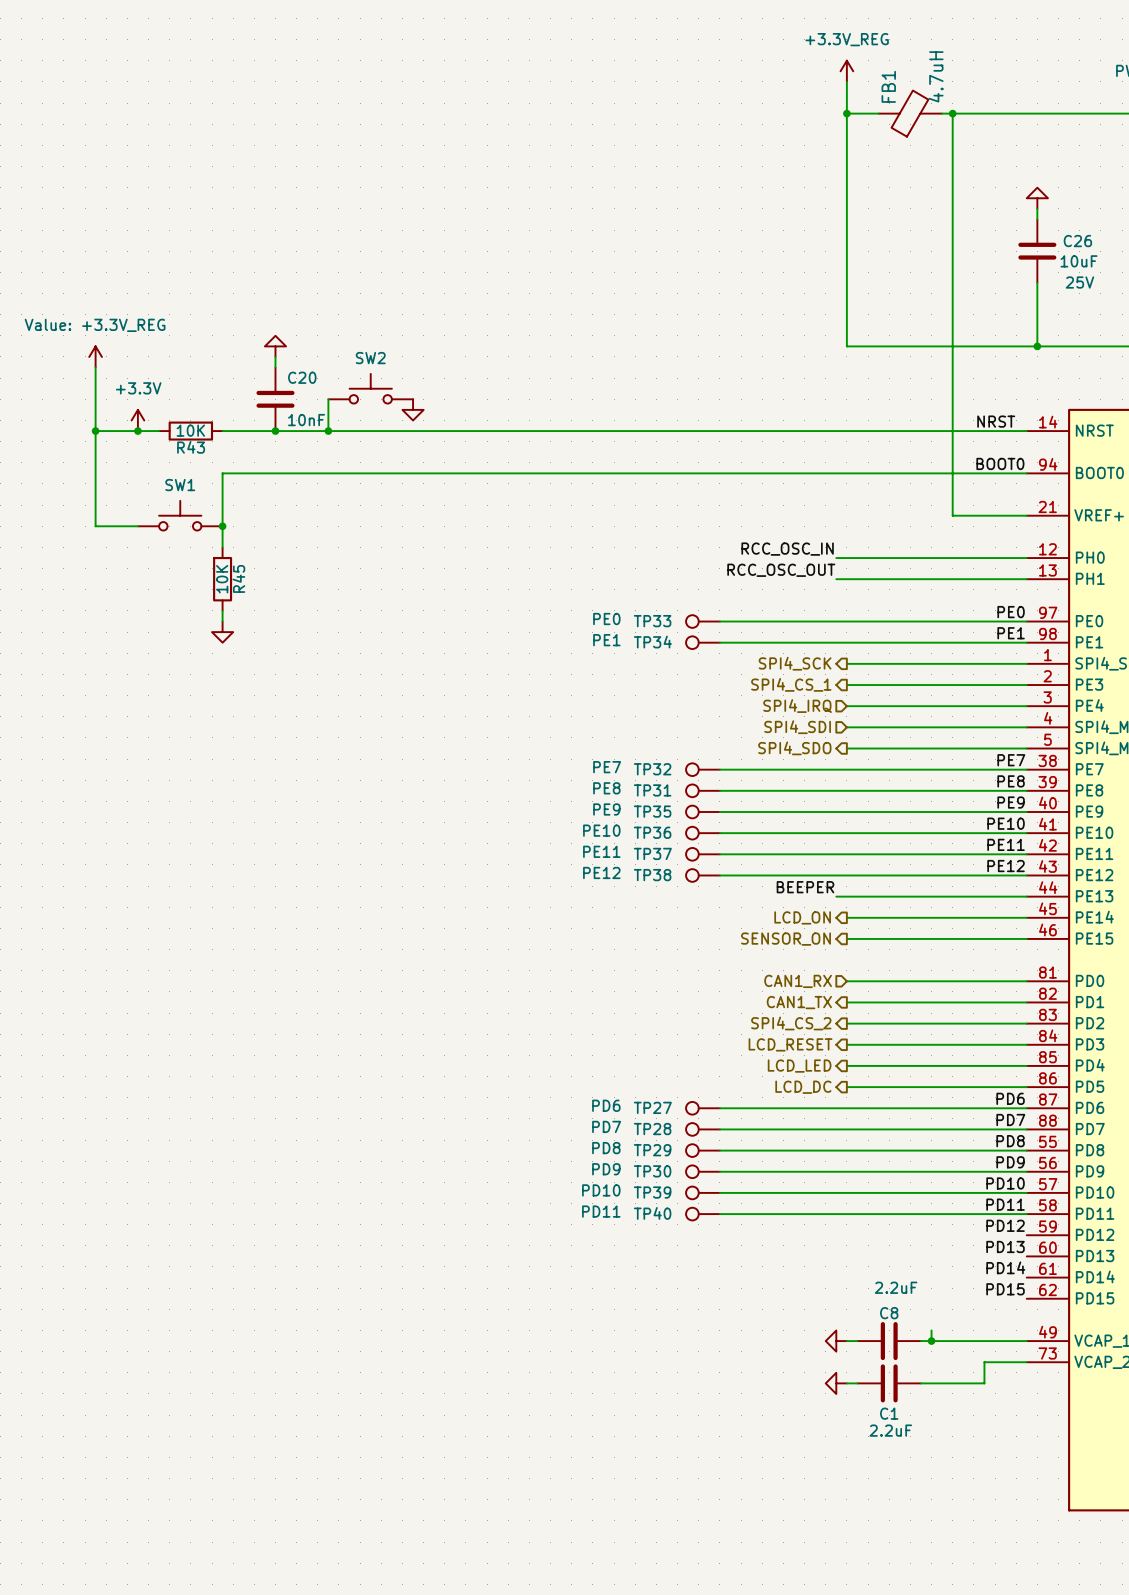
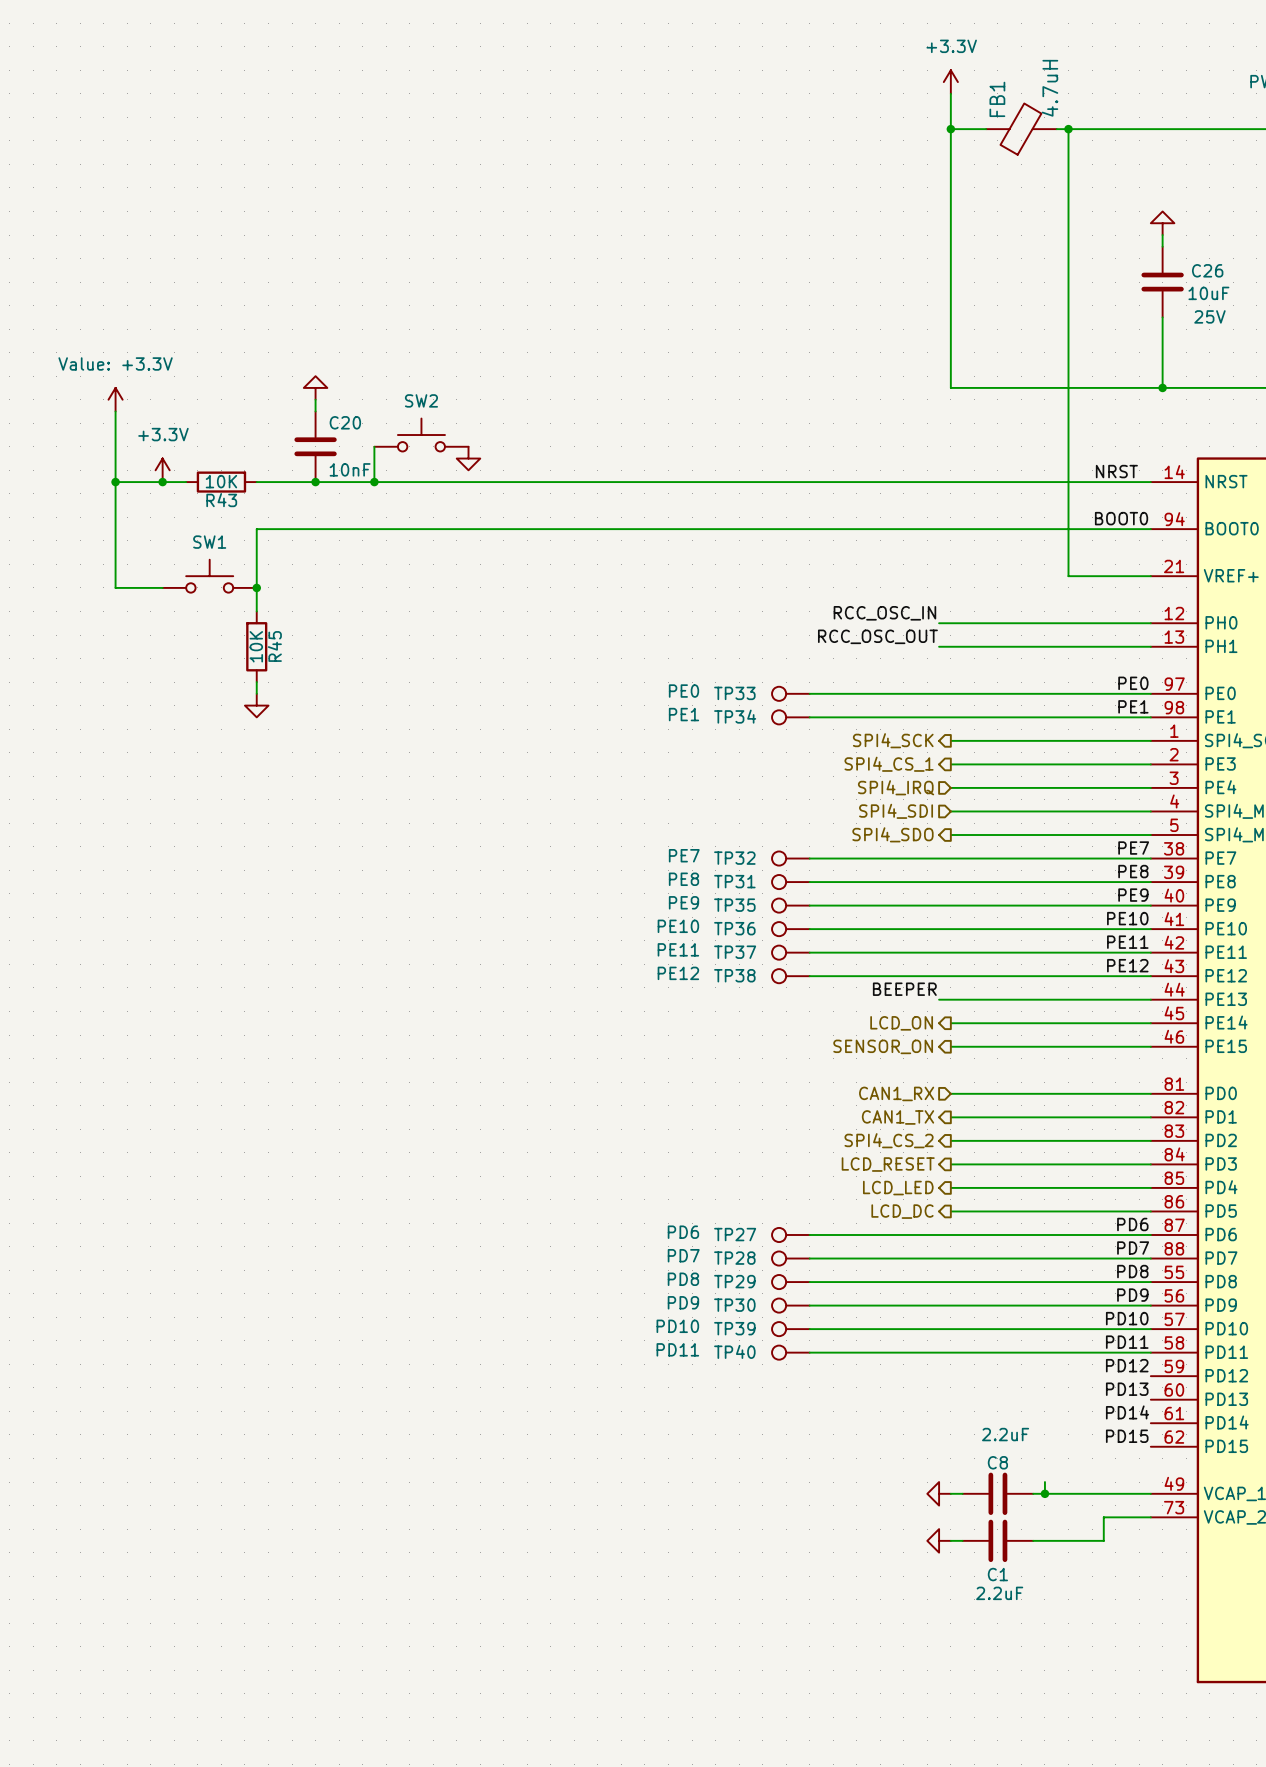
power symbol: +3.3V_REG (846, 71) -> +3.3V (950, 82)
power symbol: Value: +3.3V_REG (95, 356) -> Value: +3.3V (115, 399)

